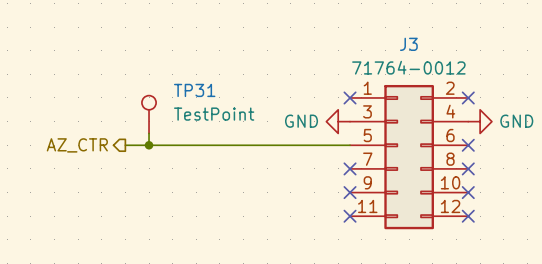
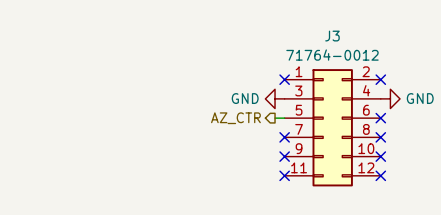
TP31: TestPoint (149, 114) -> none
wire: (149, 133) (149, 145) -> none
hierarchical label position: AZ_CTR (77, 145) -> AZ_CTR (235, 118)
wire: (125, 145) (338, 145) -> none
junction: (149, 145) -> none

